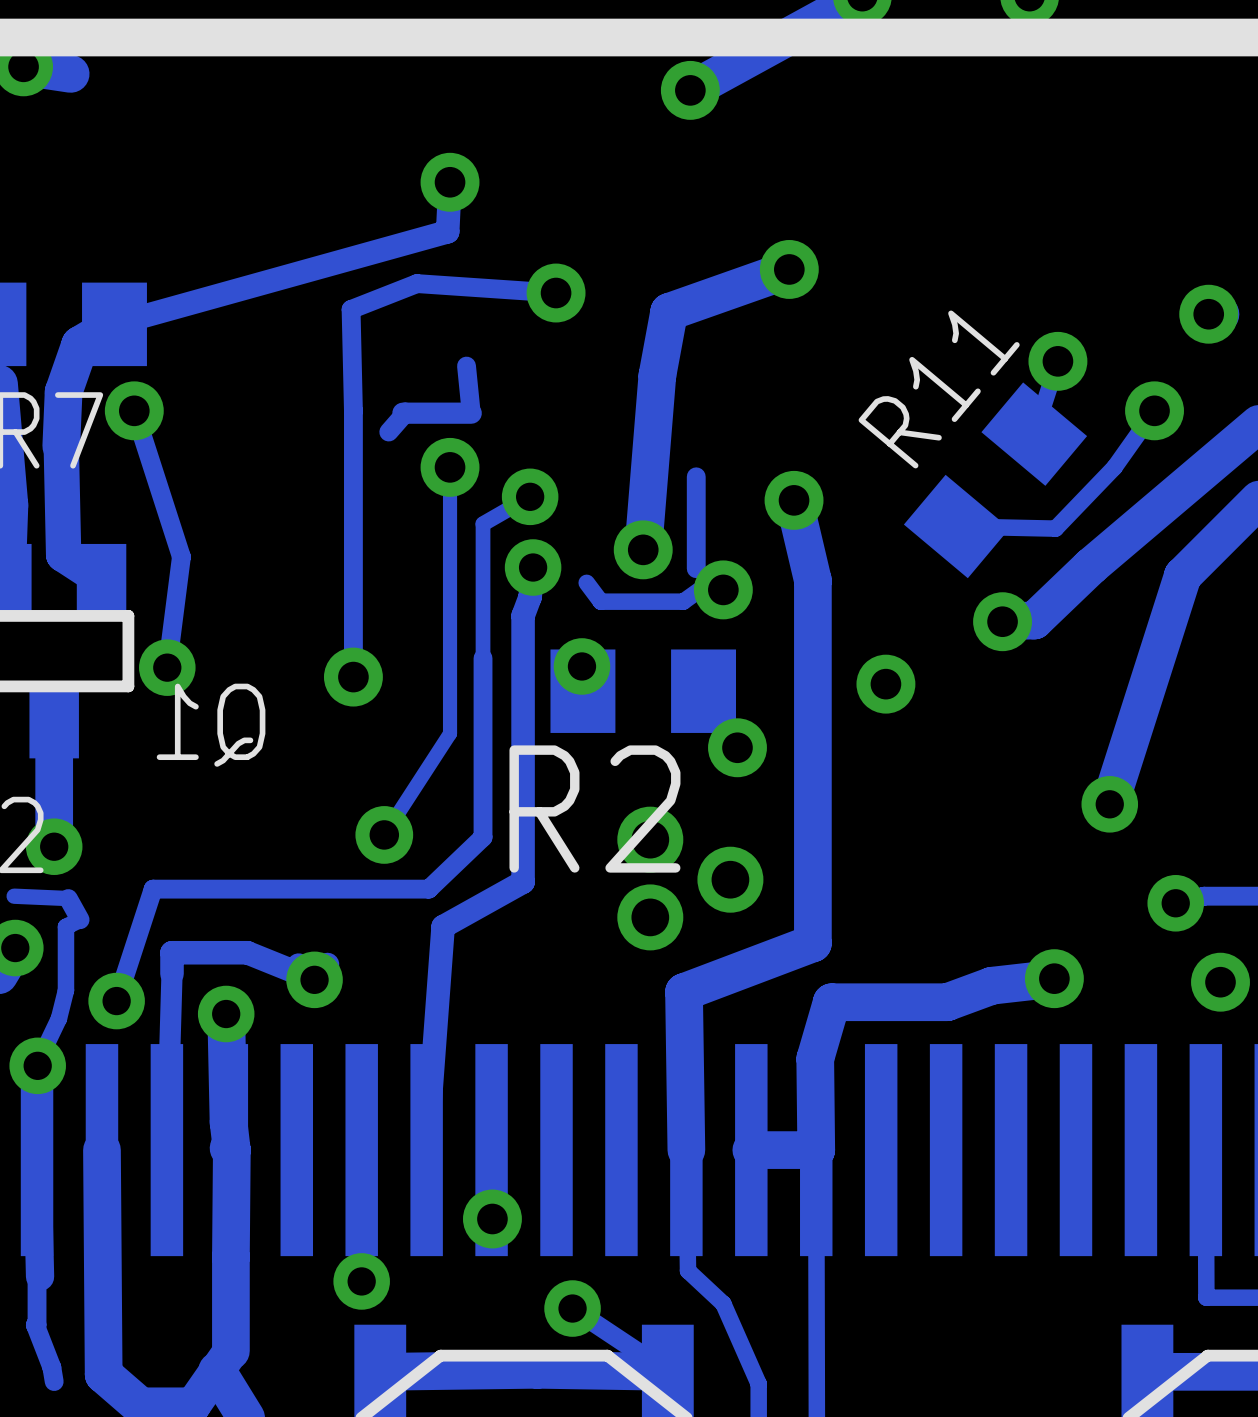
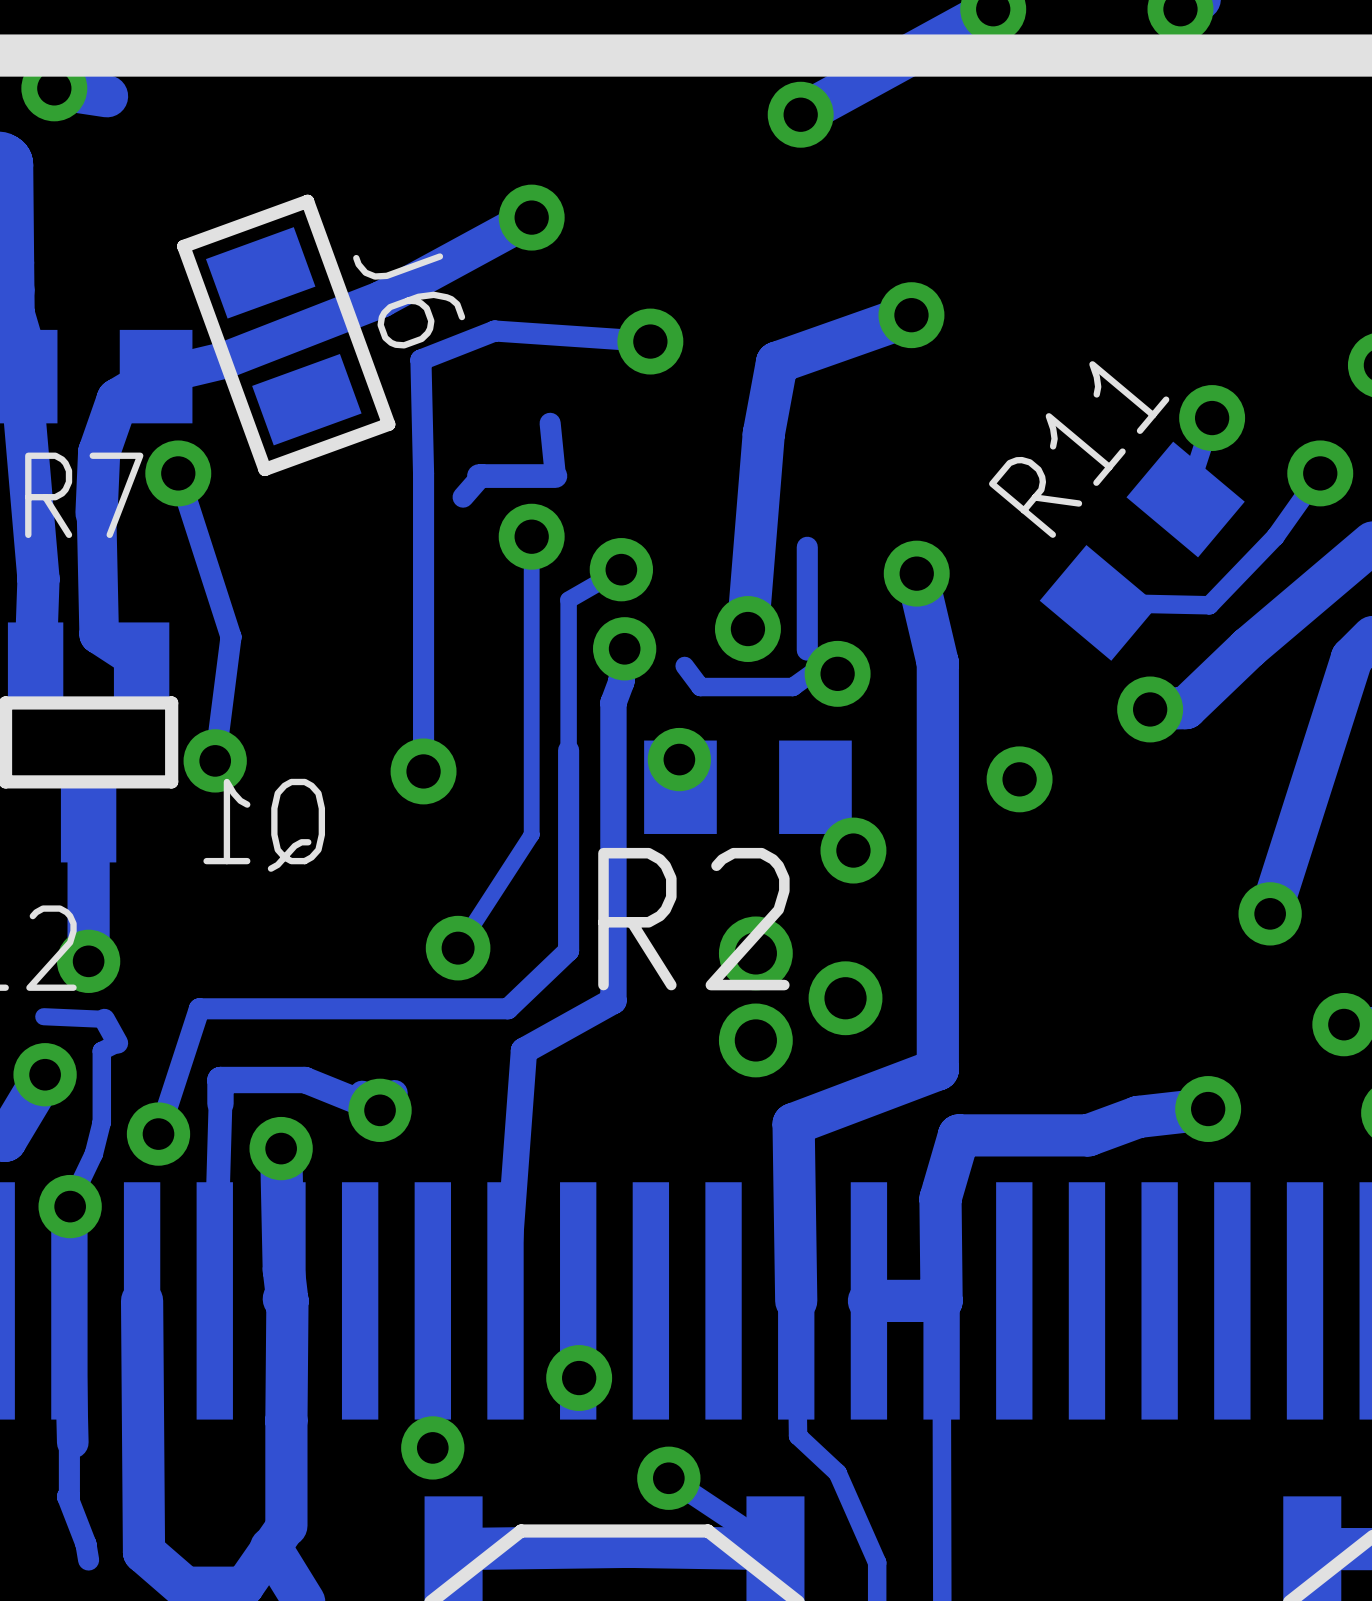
track: (450, 182) (447, 231) (114, 324) -> (531, 217) (381, 299) (225, 360) (156, 376)
J6: none -> (286, 335)

